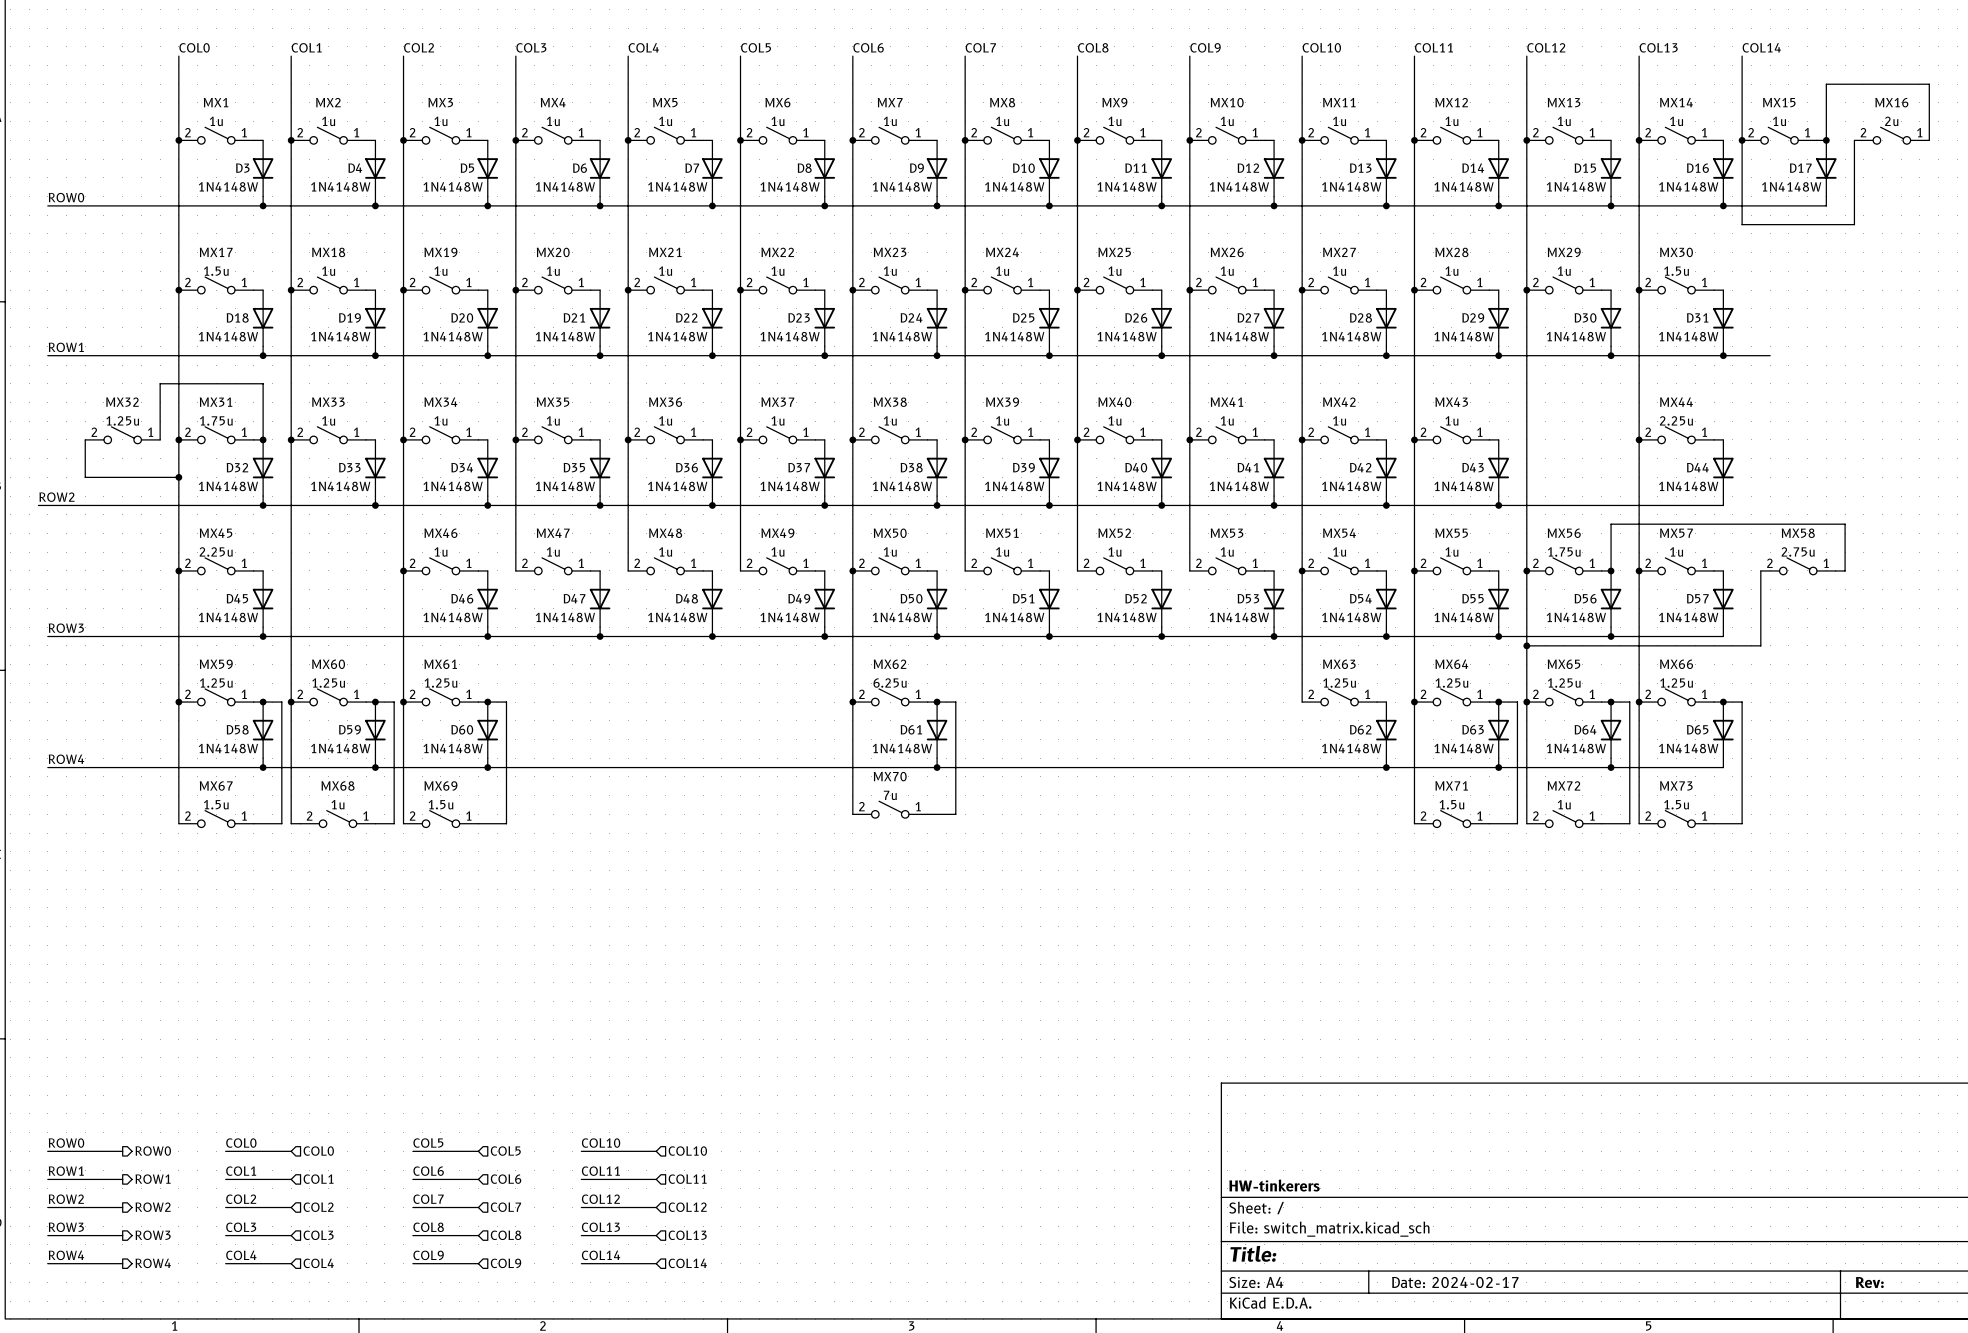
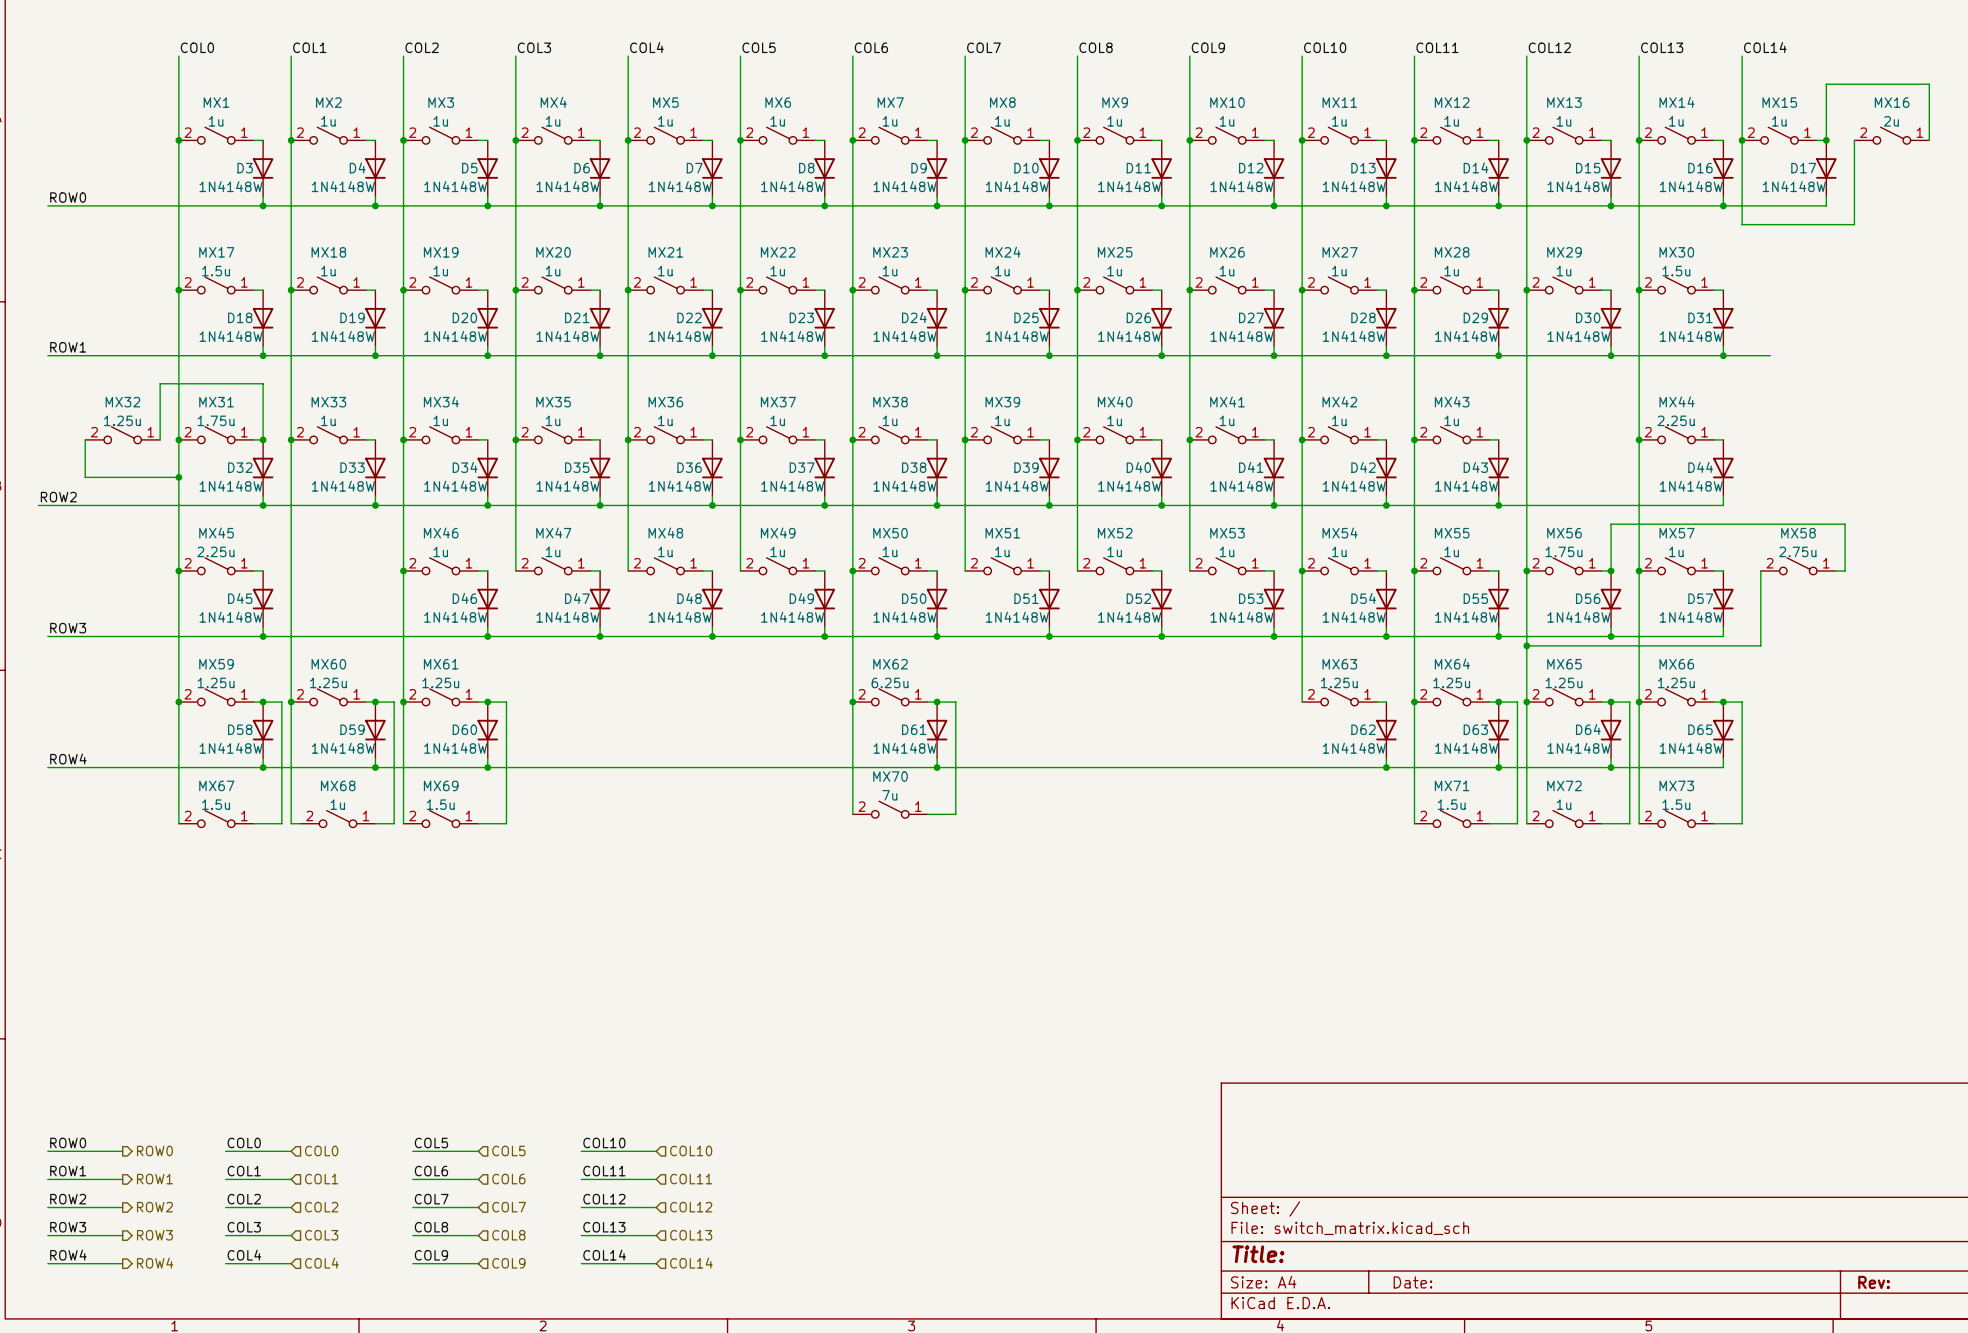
title block: HW-tinkerers (1274, 1185) -> none
title block: Date: 2024-02-17 (1455, 1282) -> Date: (1412, 1282)

